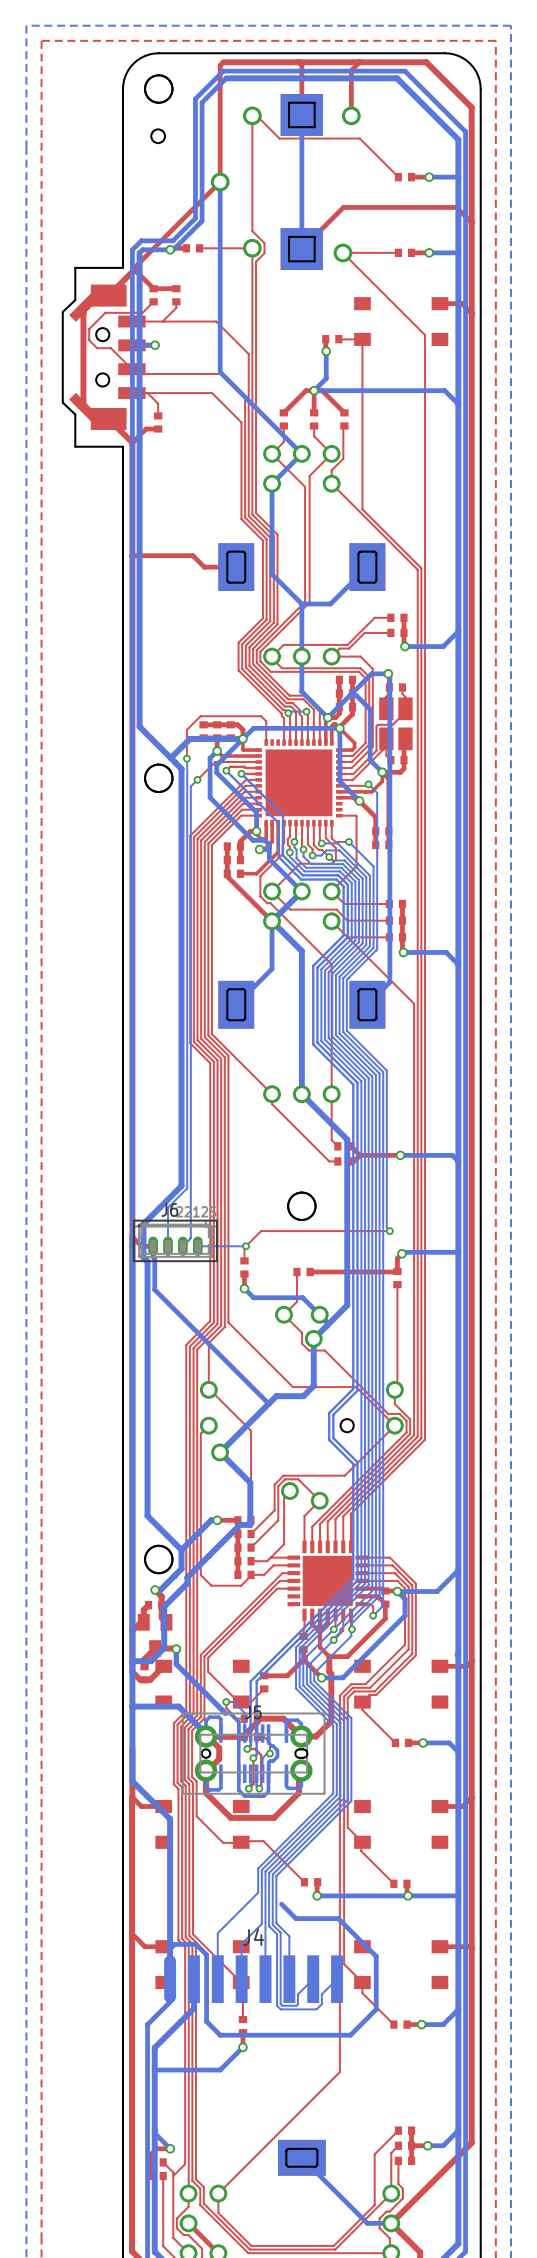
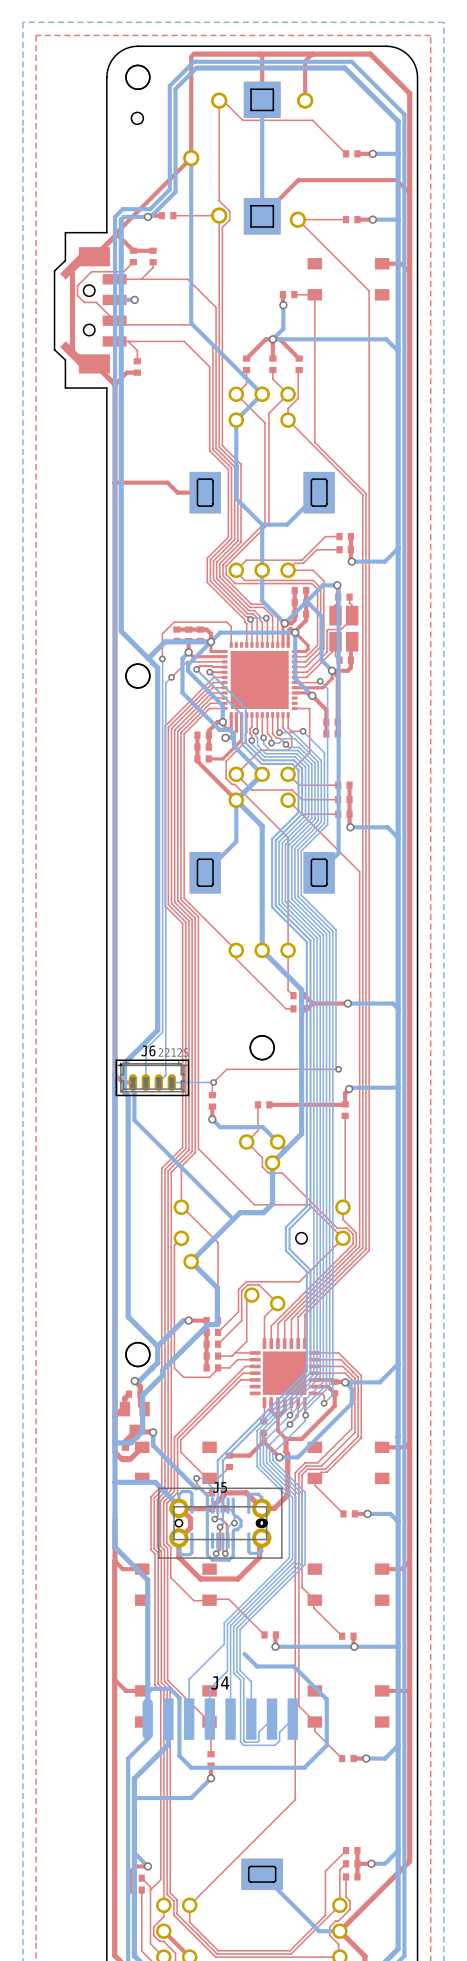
J5 footprint: [182, 1712, 326, 1795] -> [158, 1487, 283, 1559]

